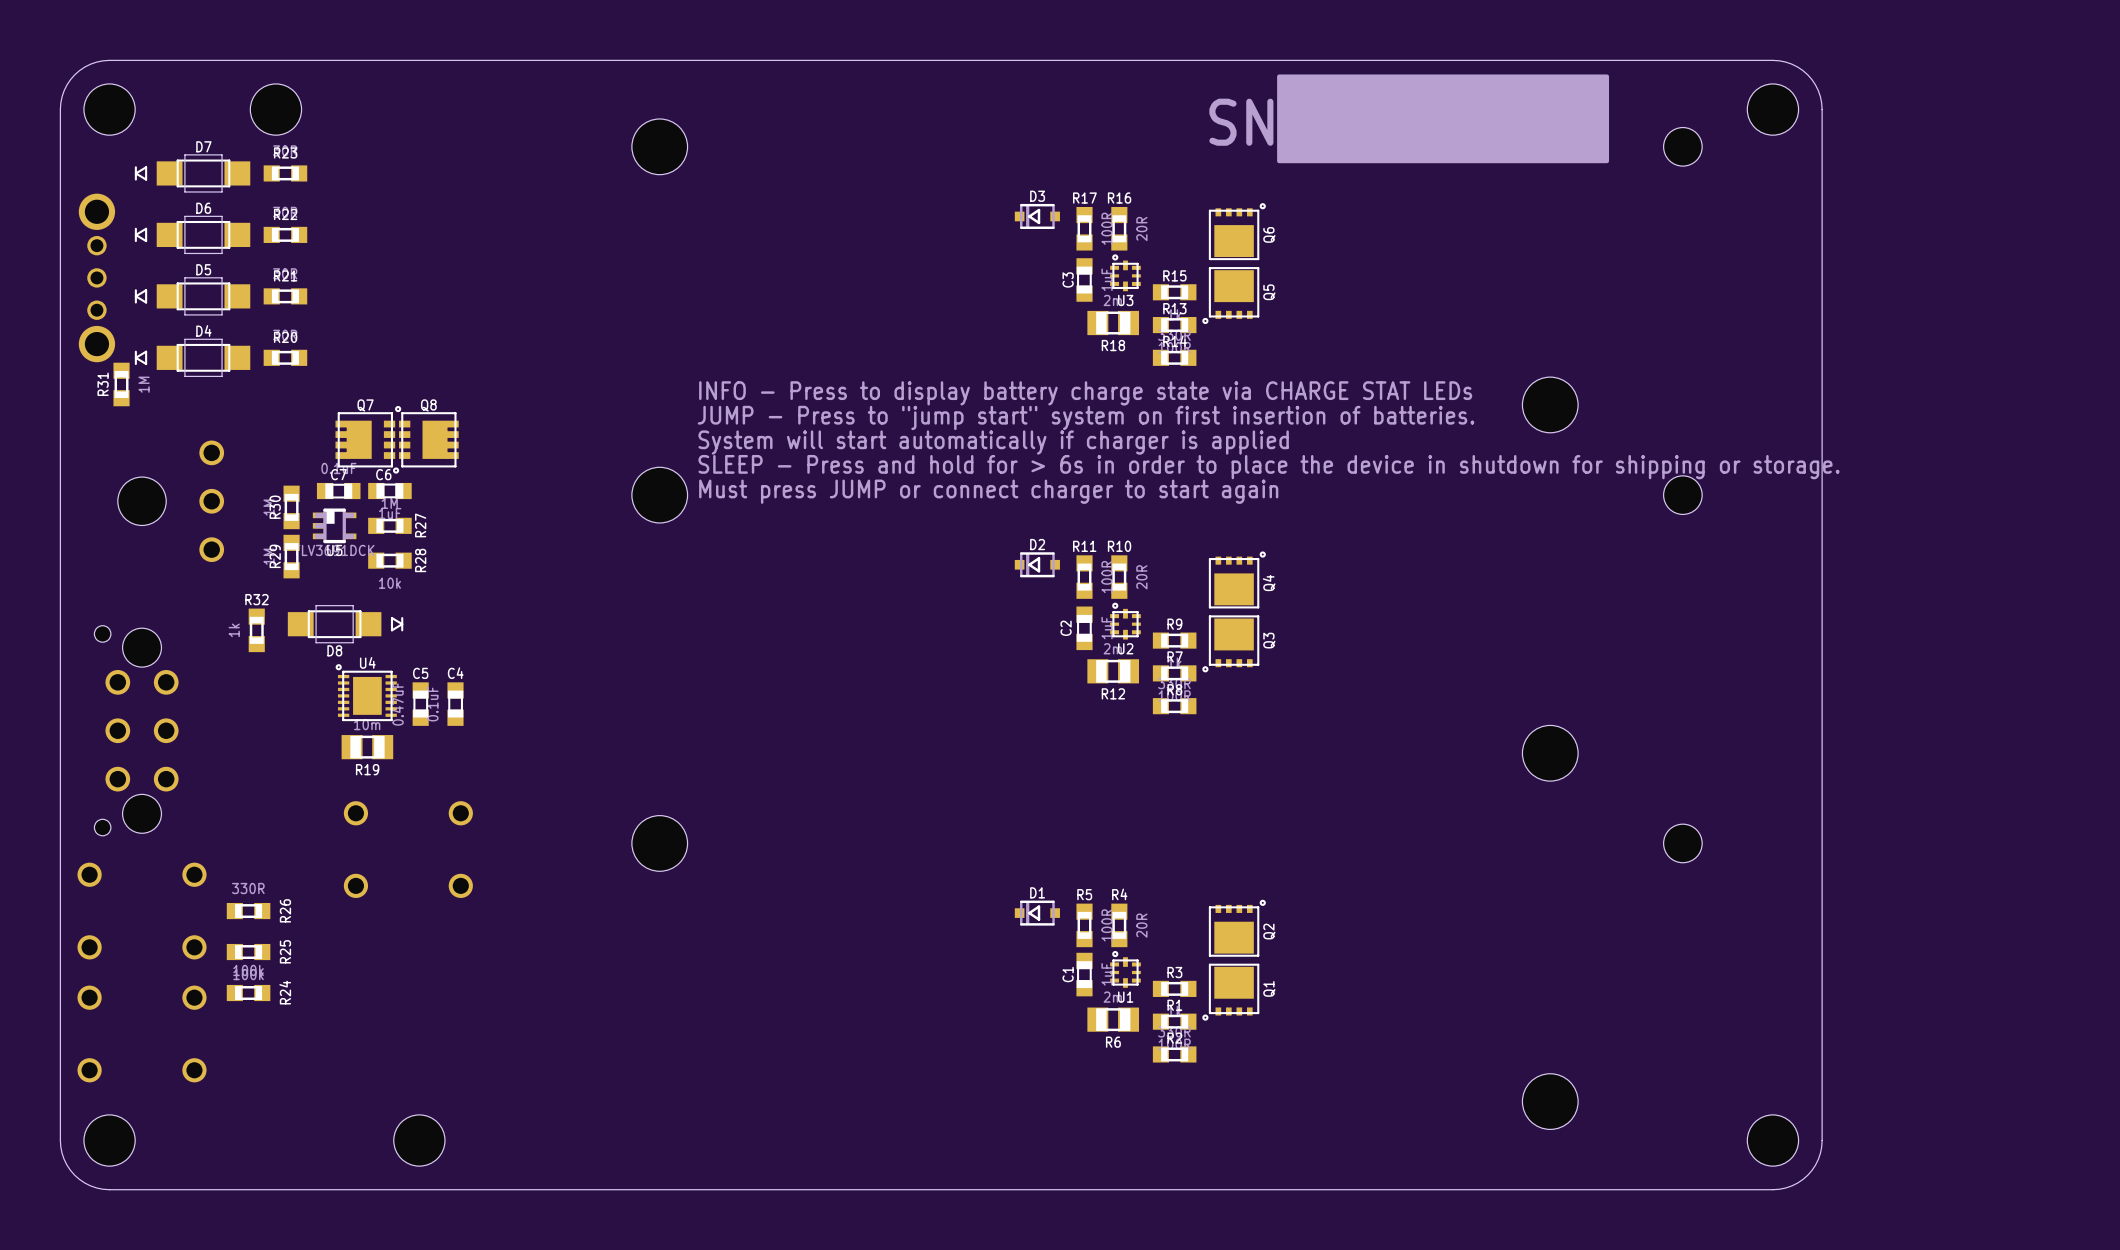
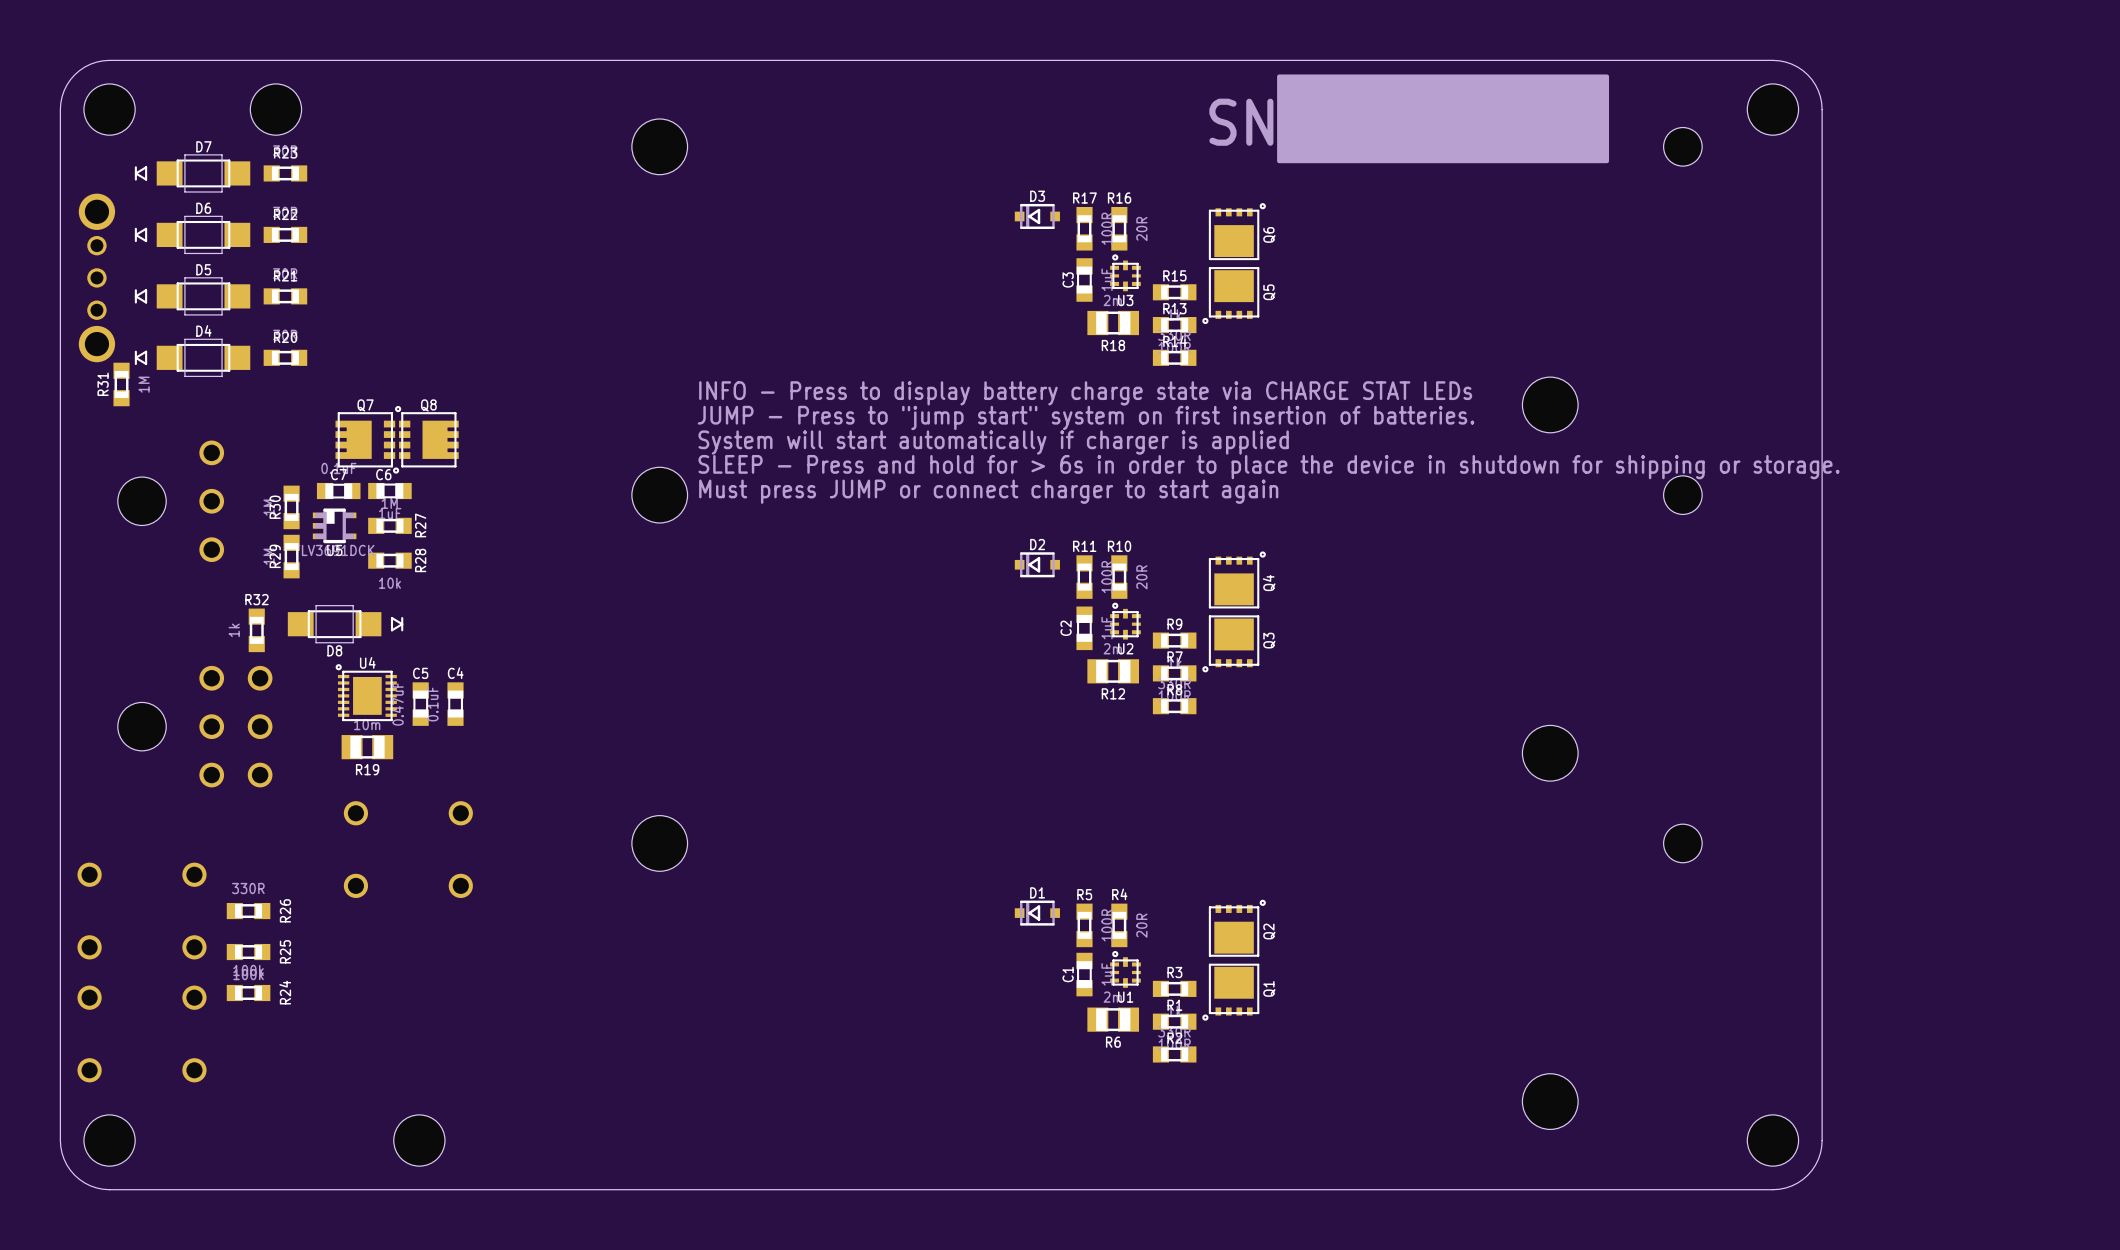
part: none -> (195, 726)
part: (136, 730) -> none

